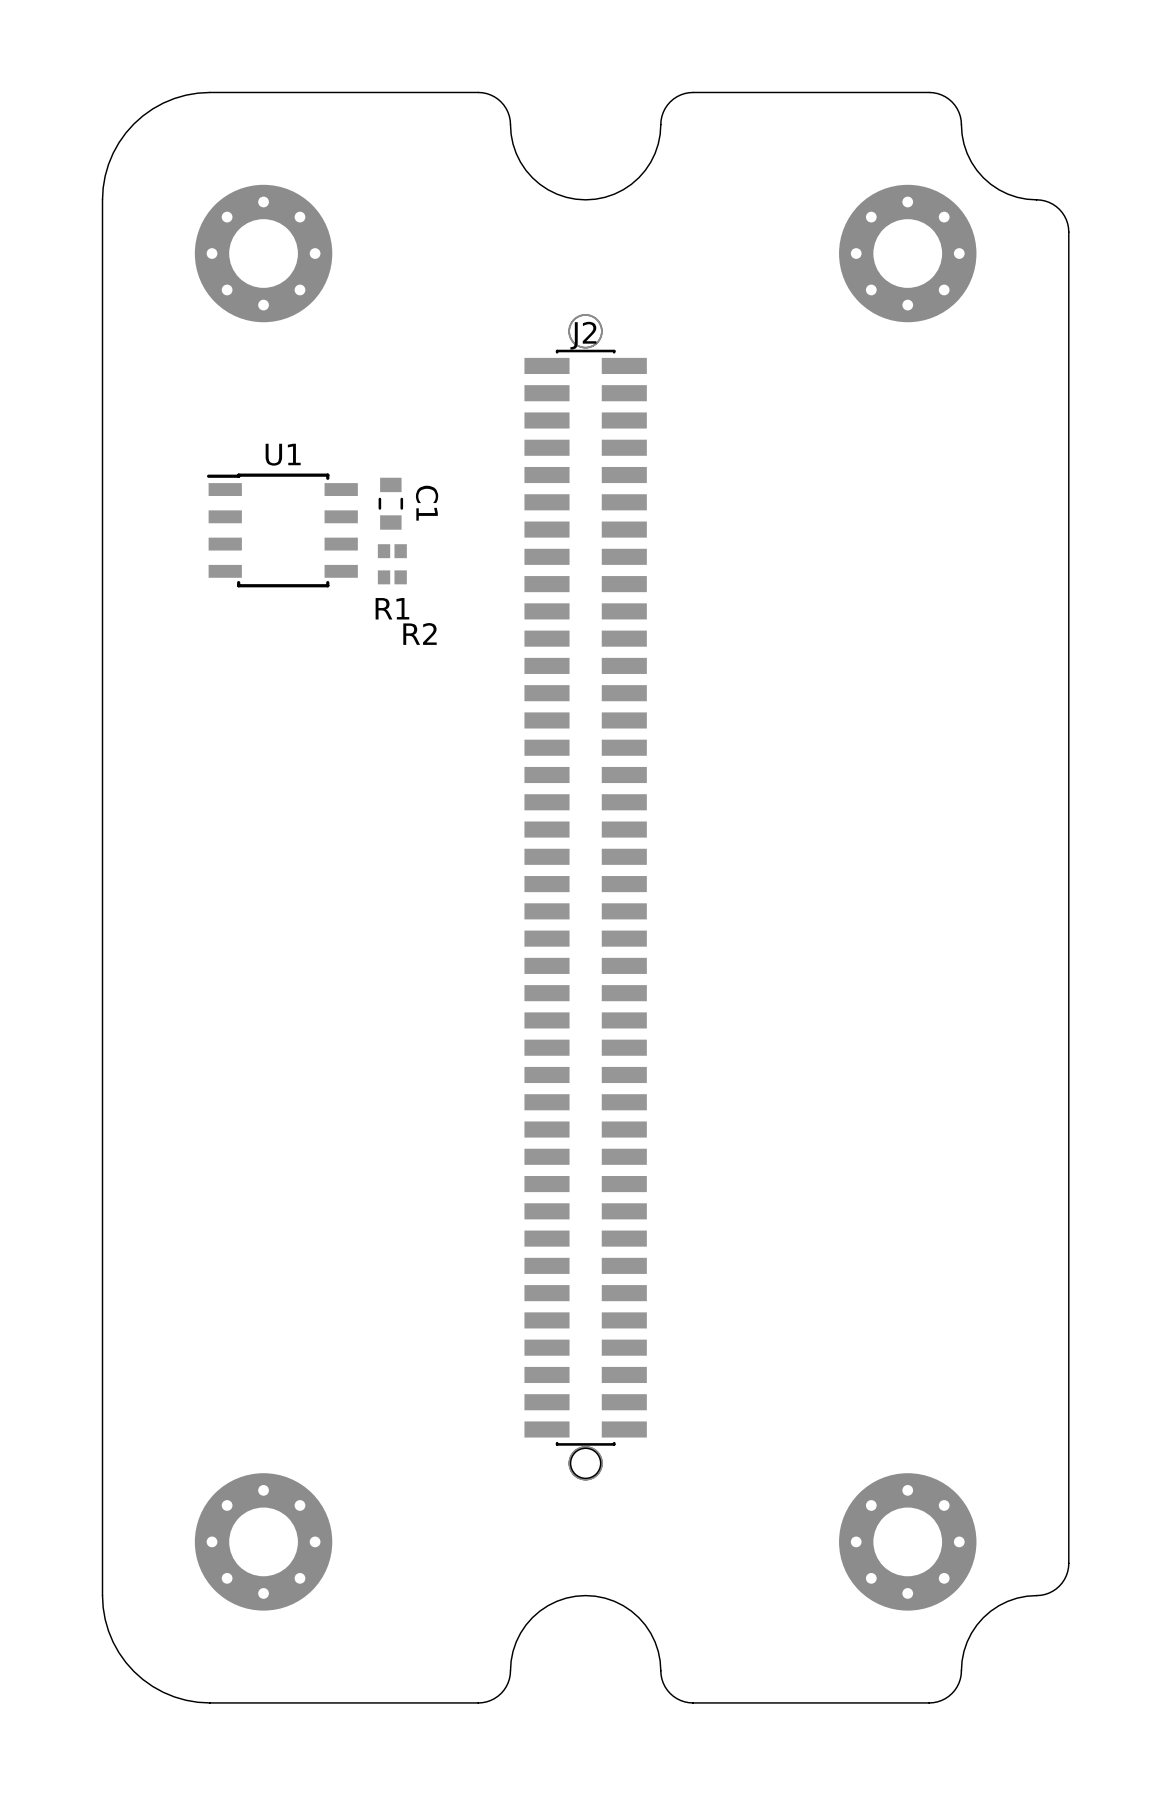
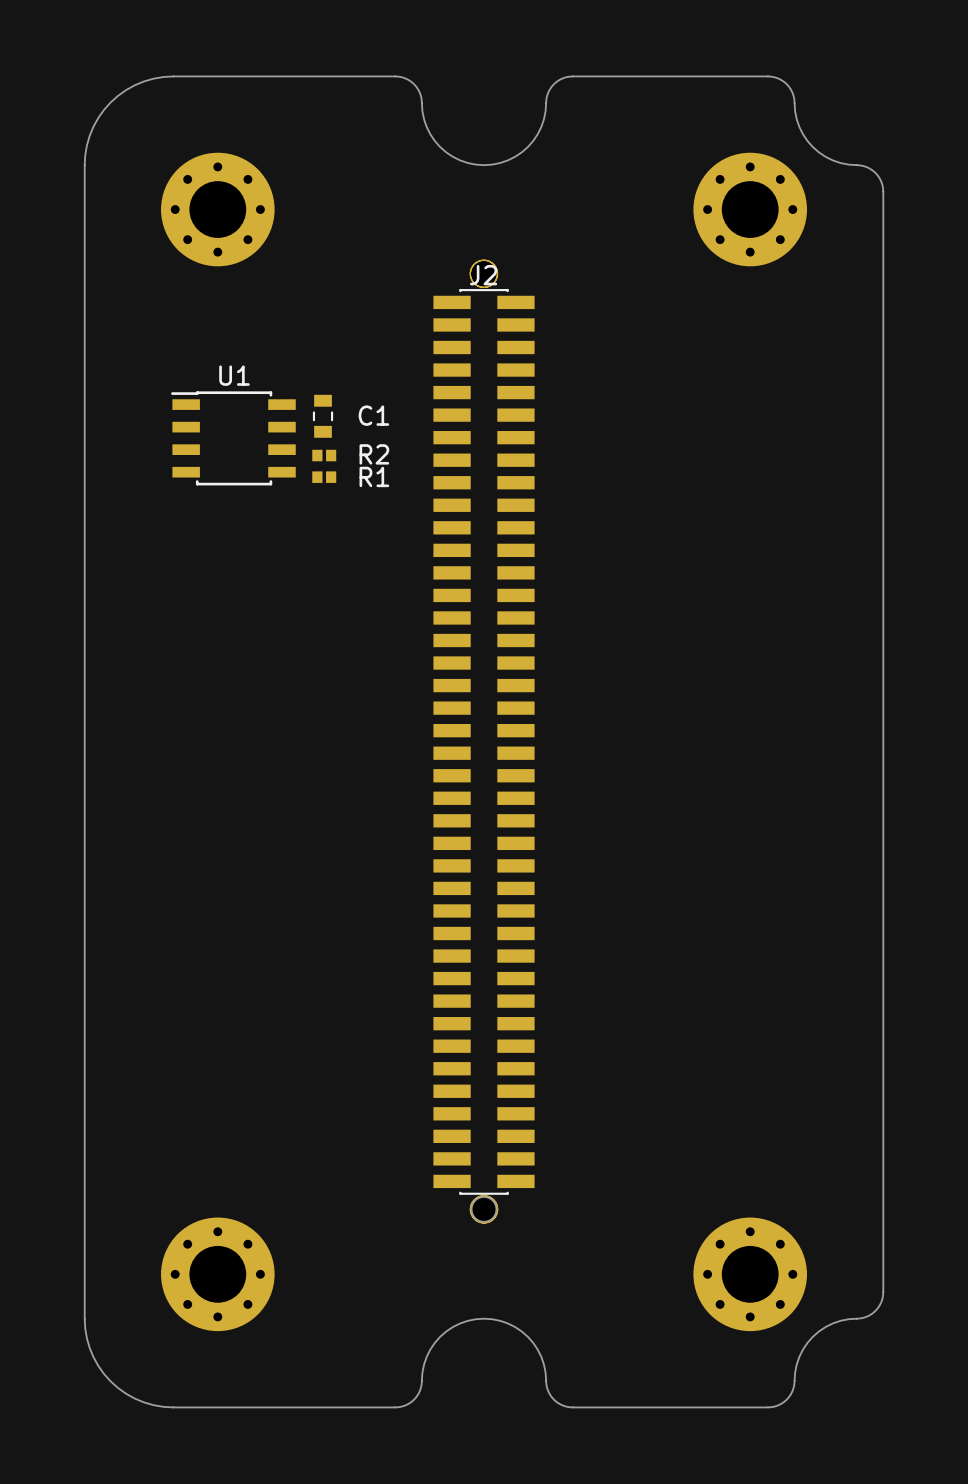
C1 name rotation: 0° (427, 503) -> 90° counterclockwise (373, 415)
R1 name position: R1 (392, 608) -> R1 (374, 476)
R2 name position: R2 (419, 633) -> R2 (374, 454)

